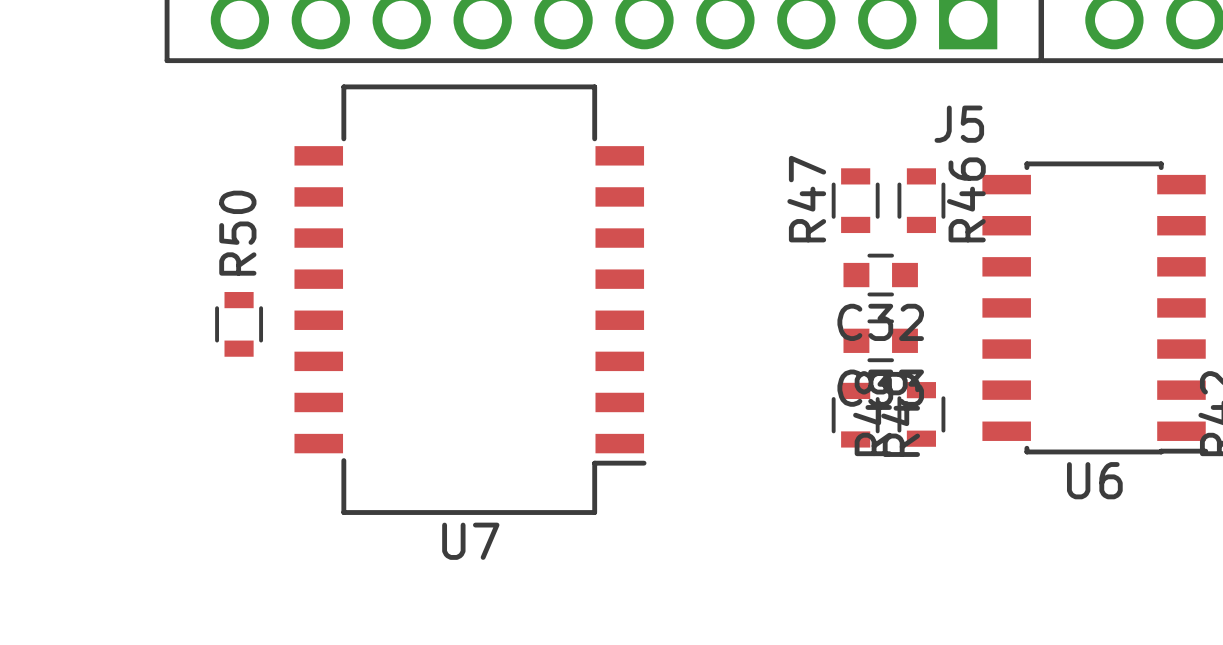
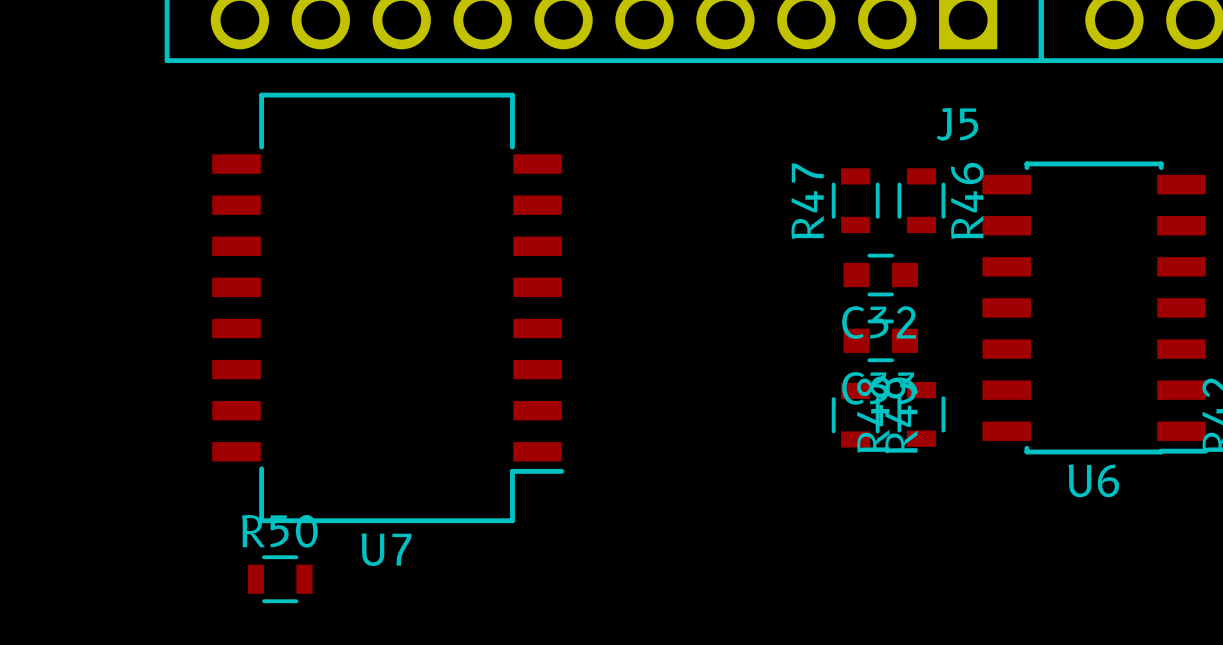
U7 position: (470, 299) -> (388, 307)
R50 rotation: 0° (239, 324) -> 90° clockwise (280, 579)
R50 position: (239, 324) -> (280, 579)

